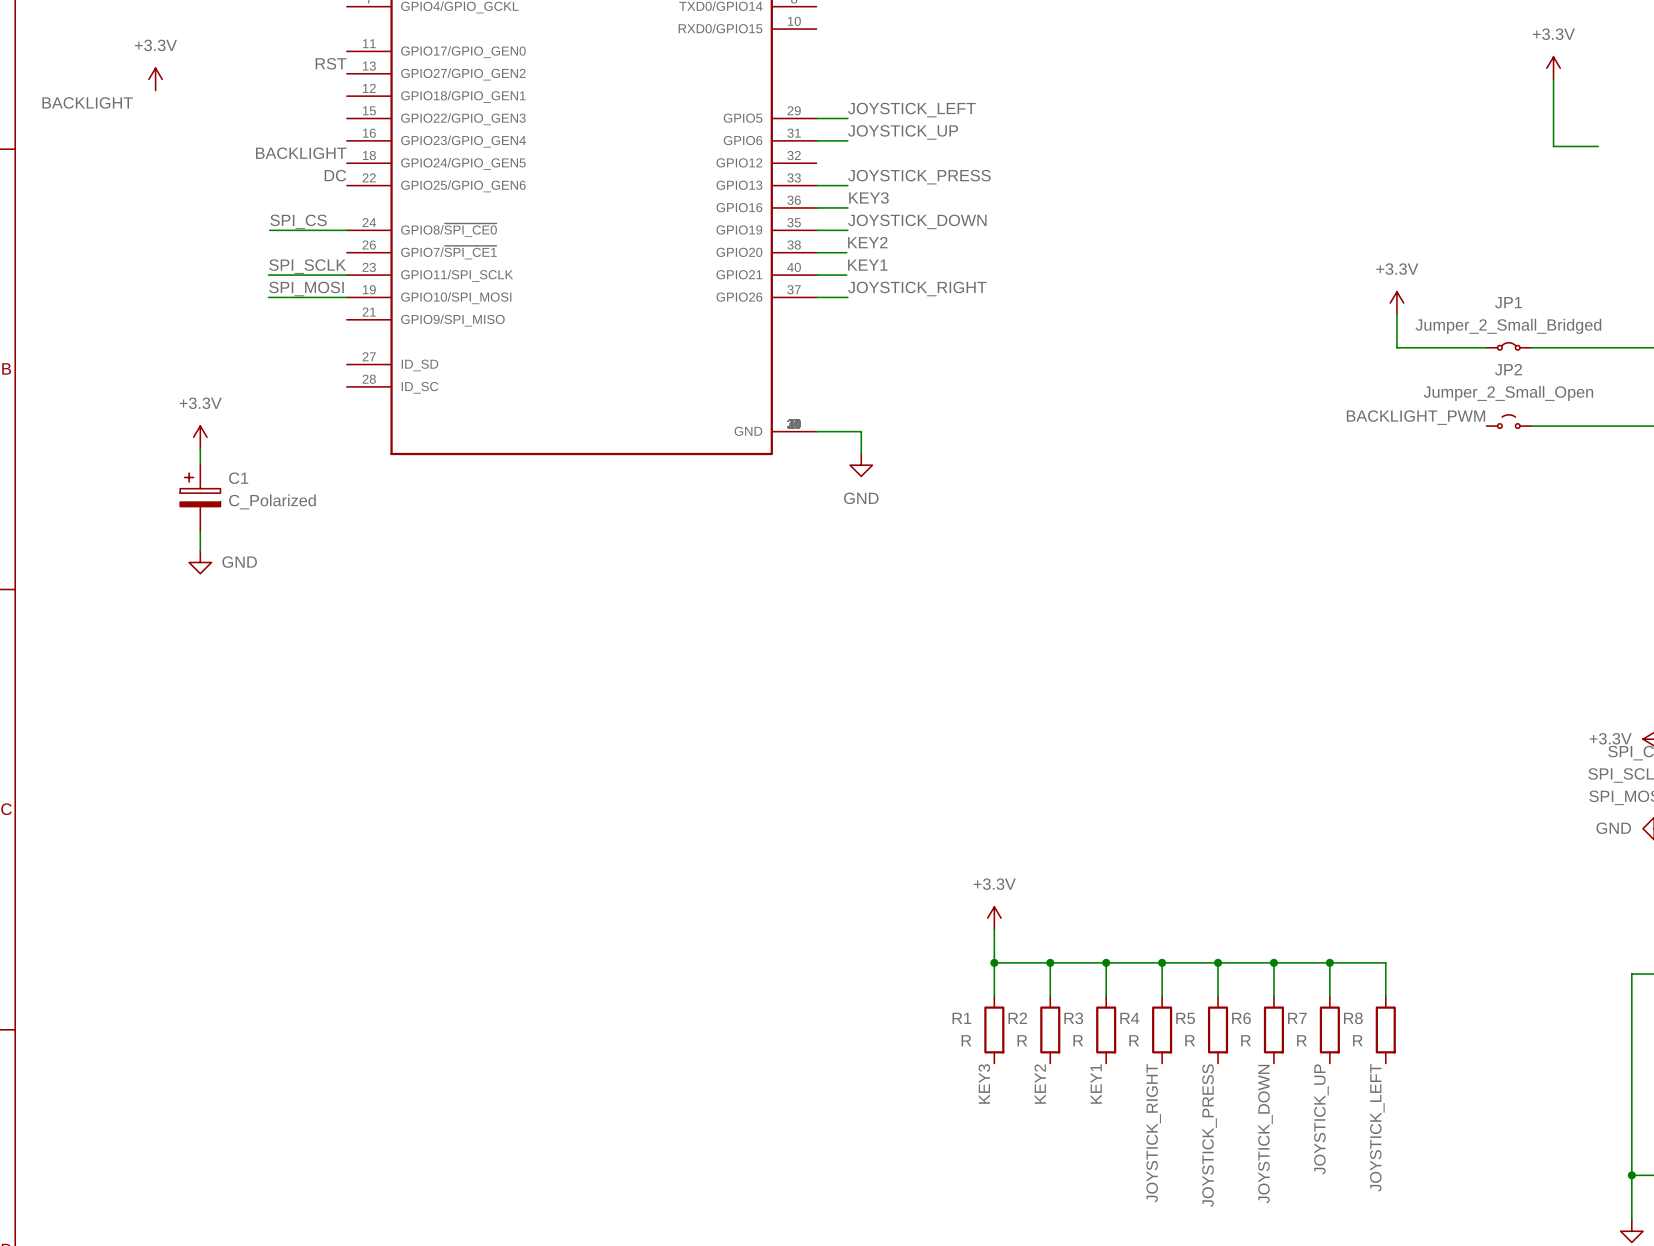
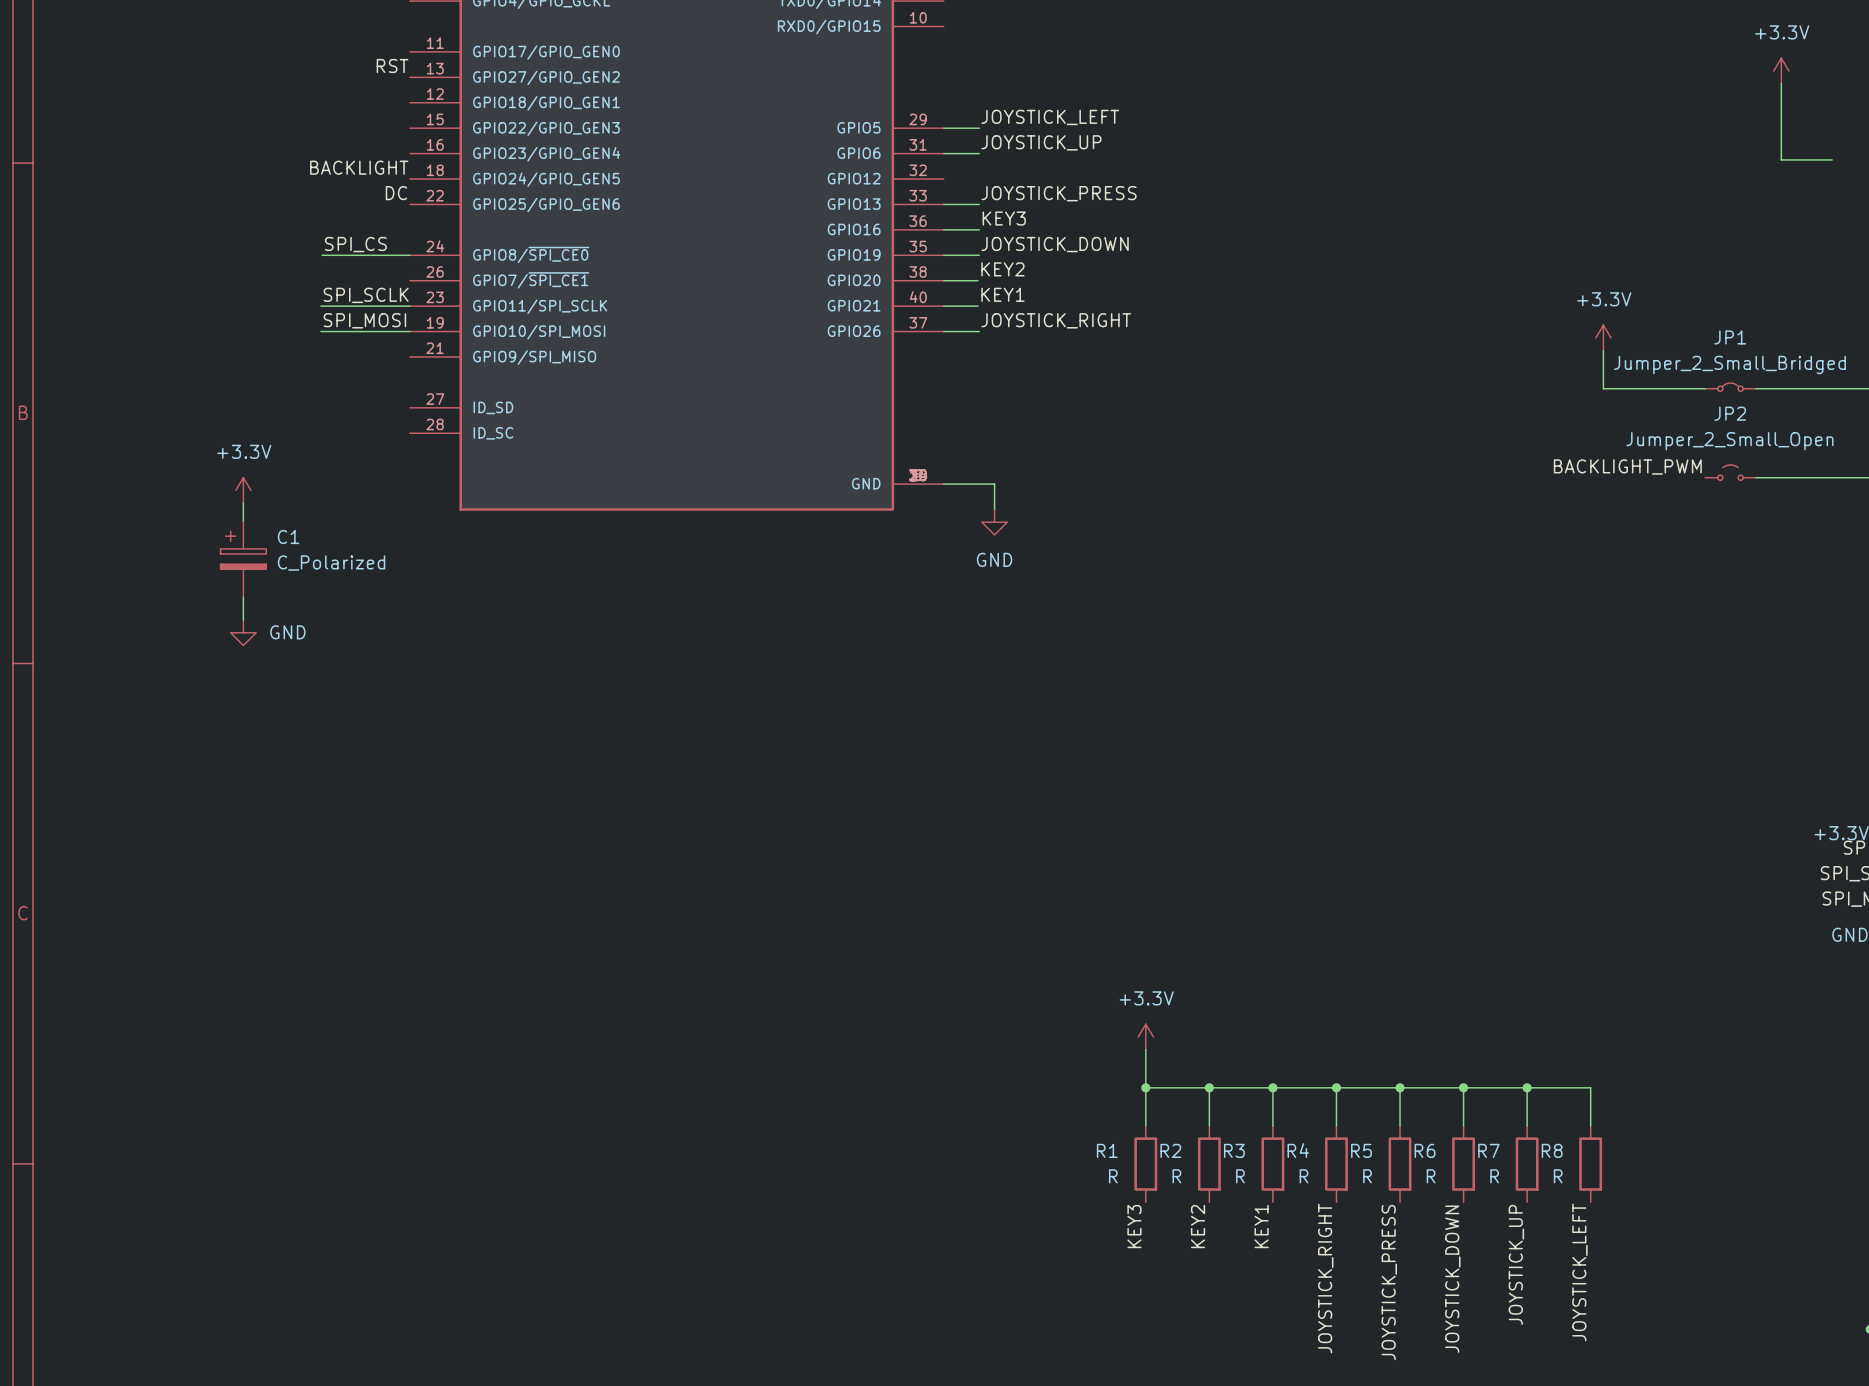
power symbol: +3.3V (155, 79) -> none
label: BACKLIGHT (87, 102) -> none

